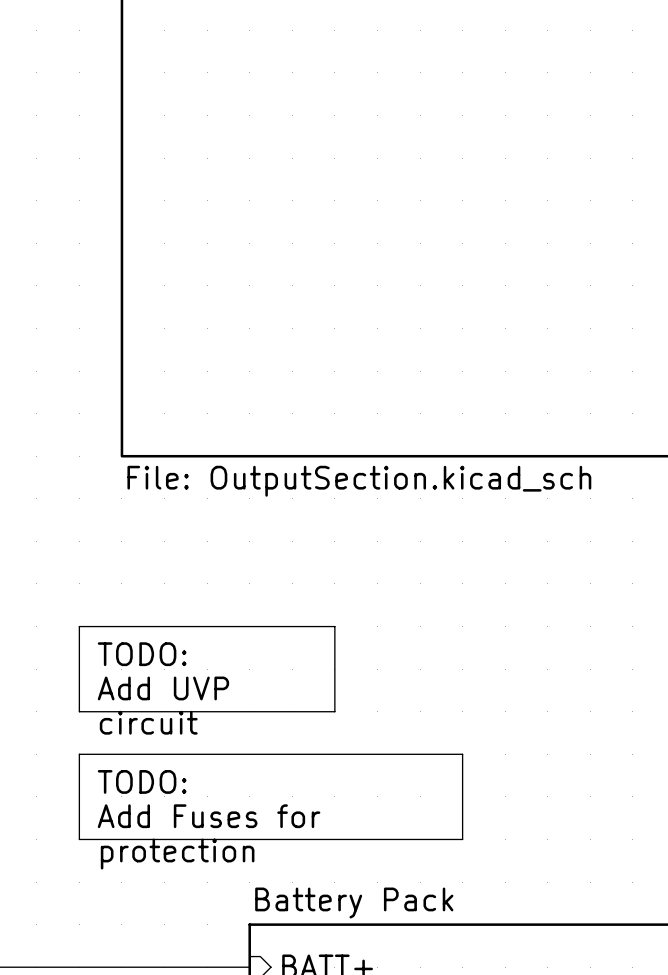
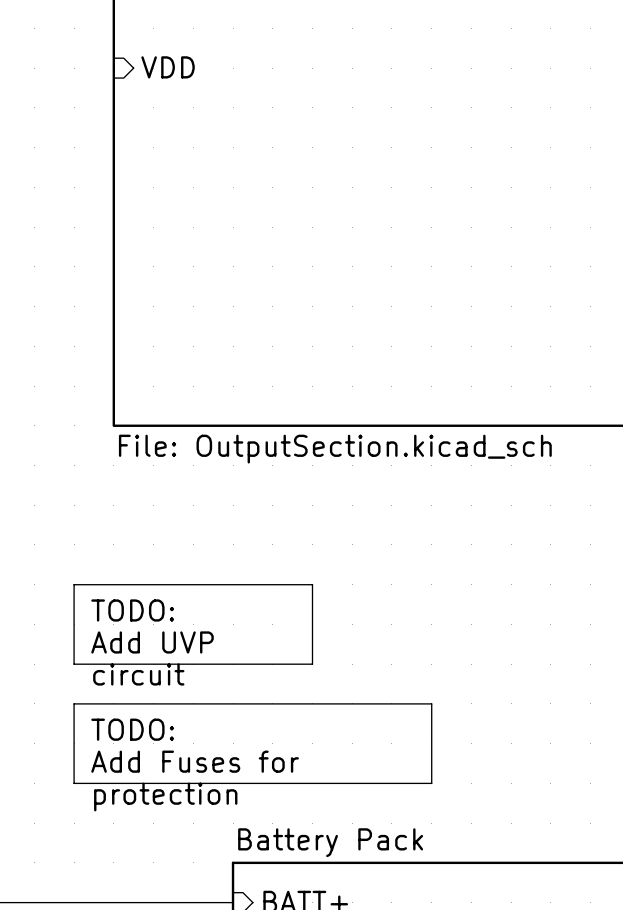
sheet pin: none -> VDD (168, 67)

